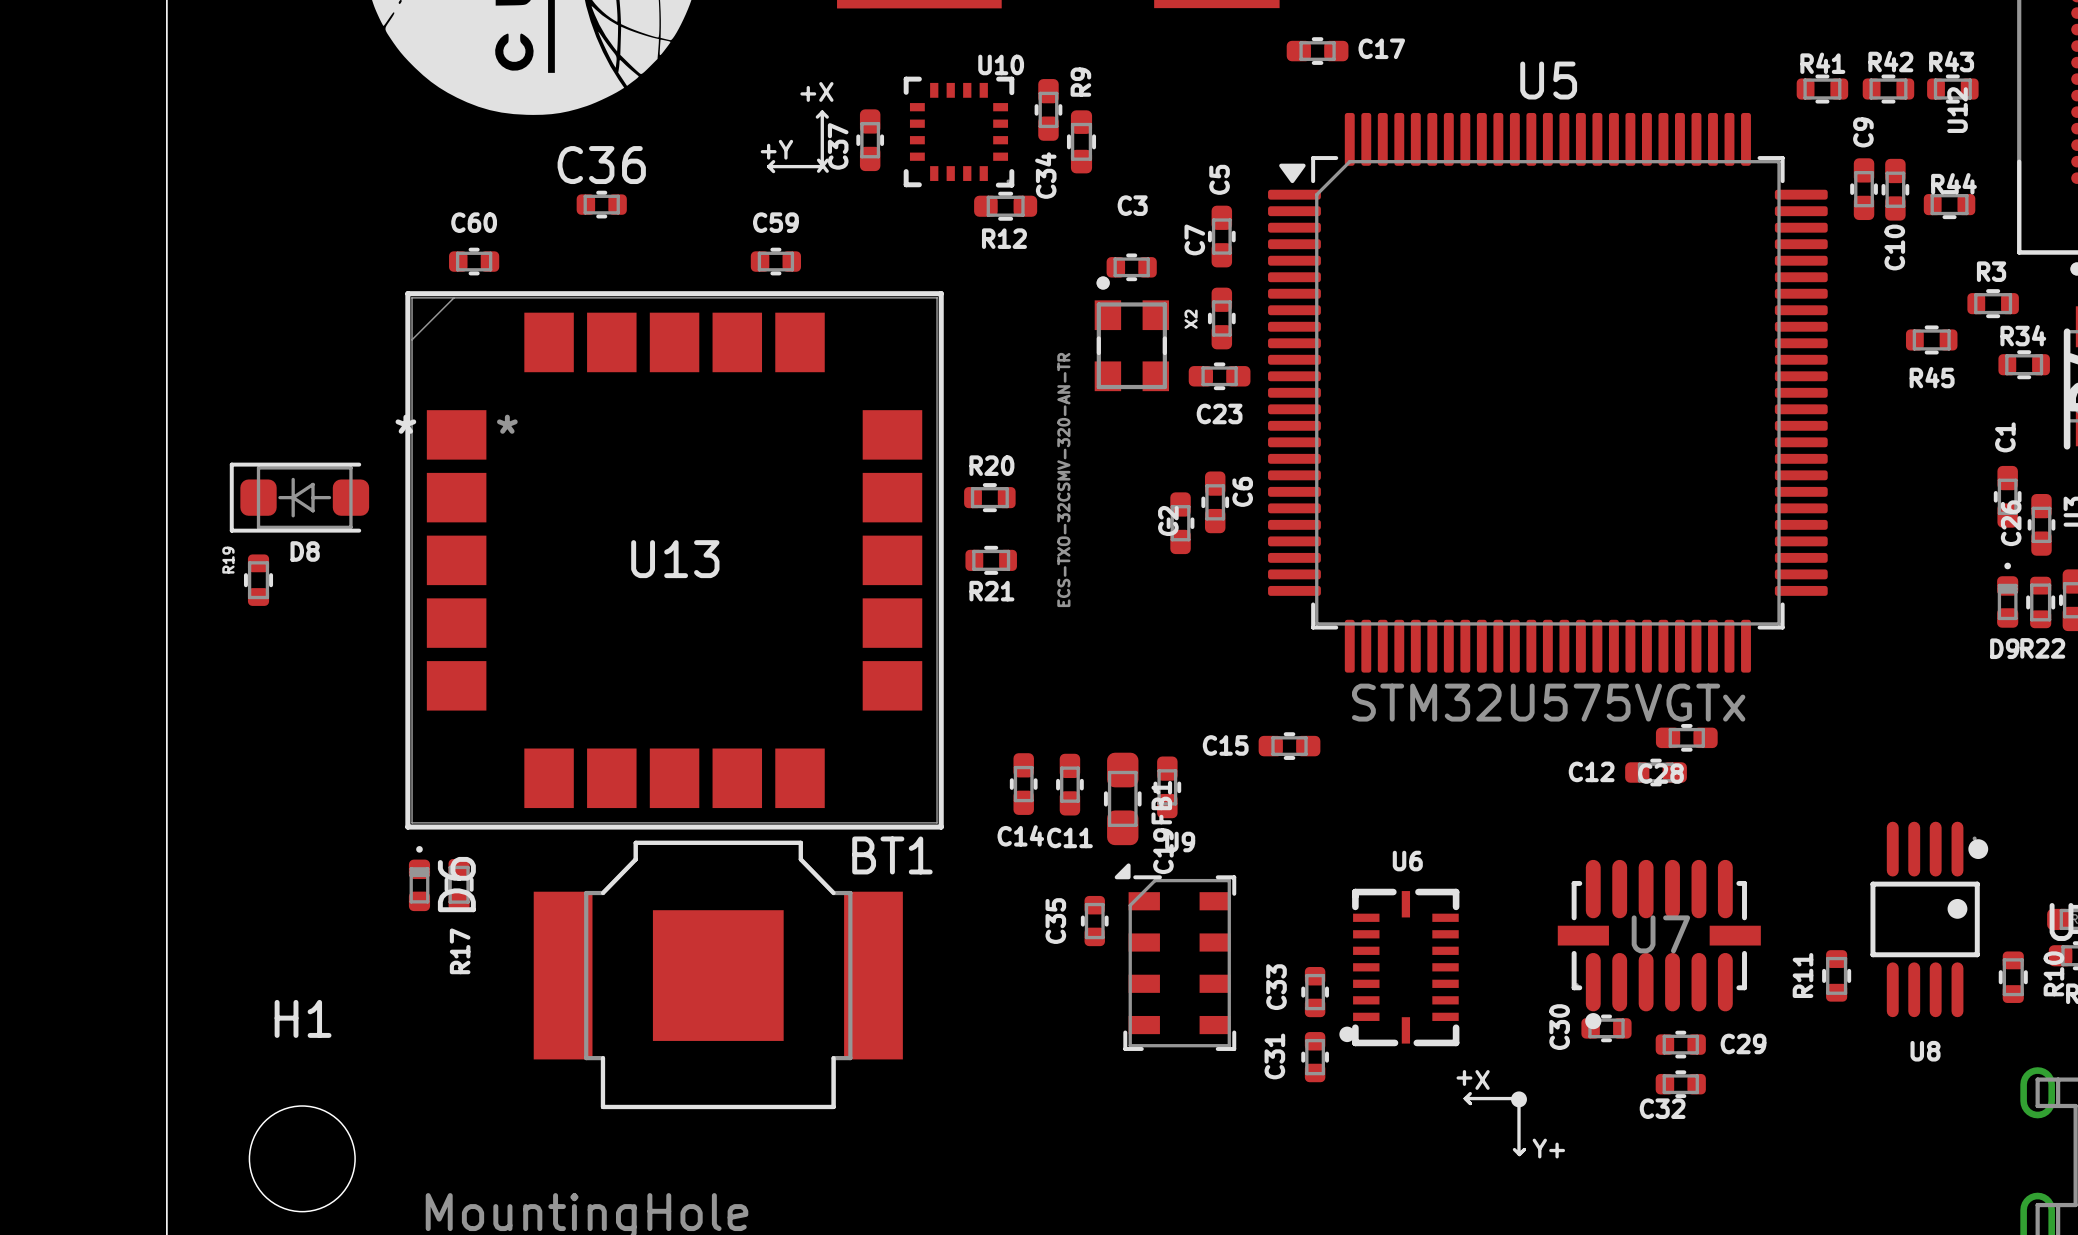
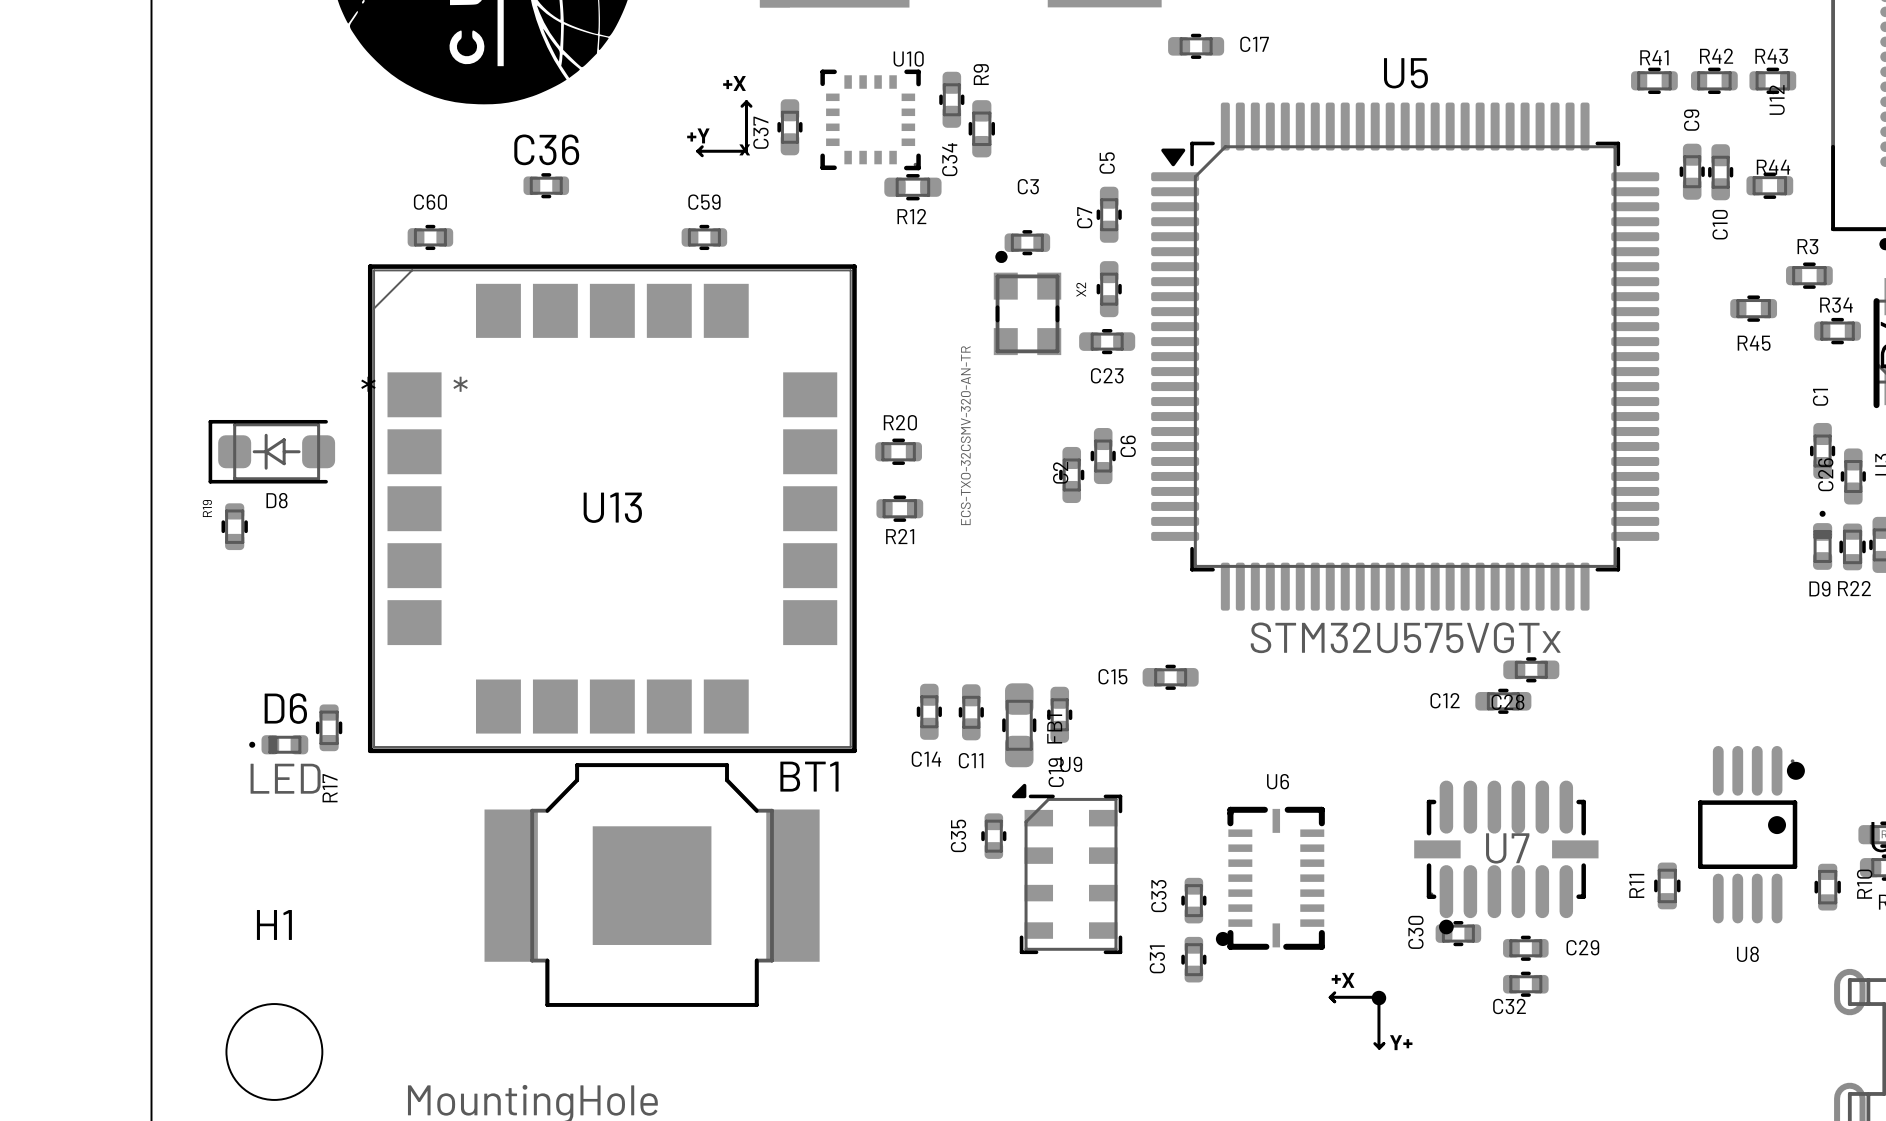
D6 value: none -> LED (285, 778)
D6 rotation: 0° (419, 878) -> 90° counterclockwise (278, 744)
D6 position: (419, 878) -> (278, 744)
R17 position: (459, 884) -> (329, 727)

